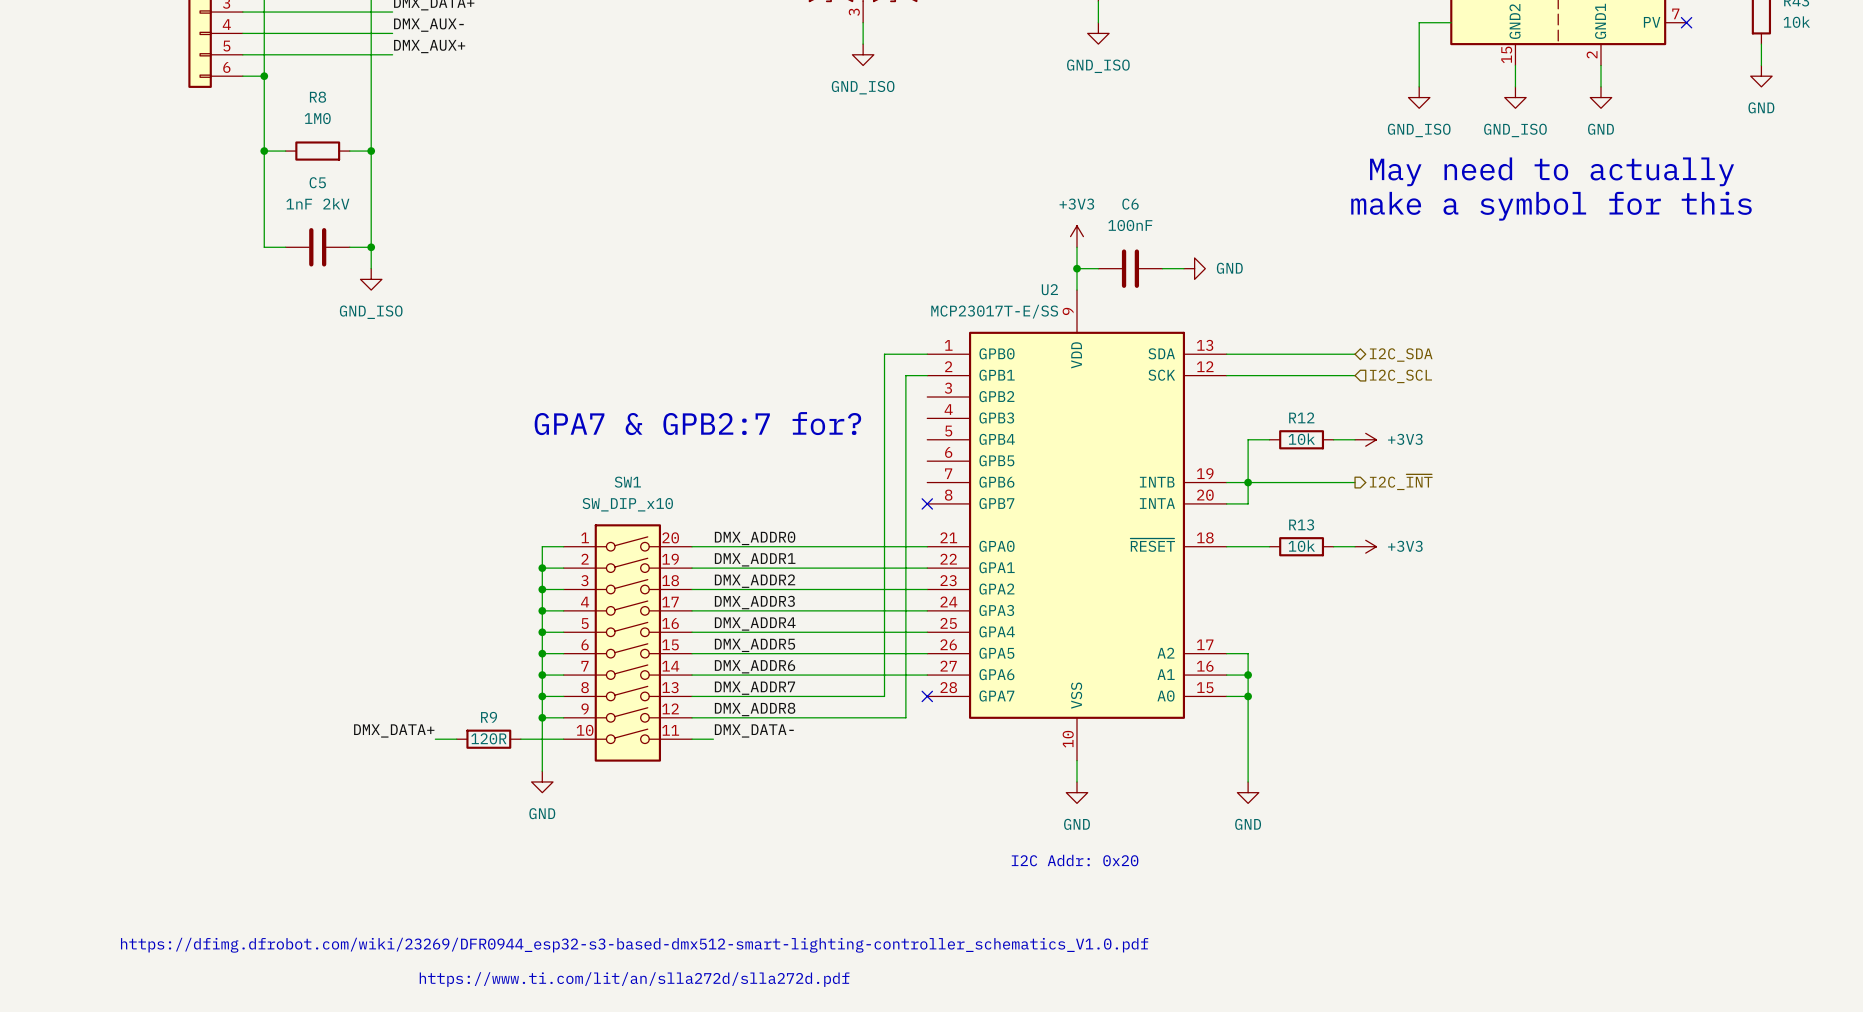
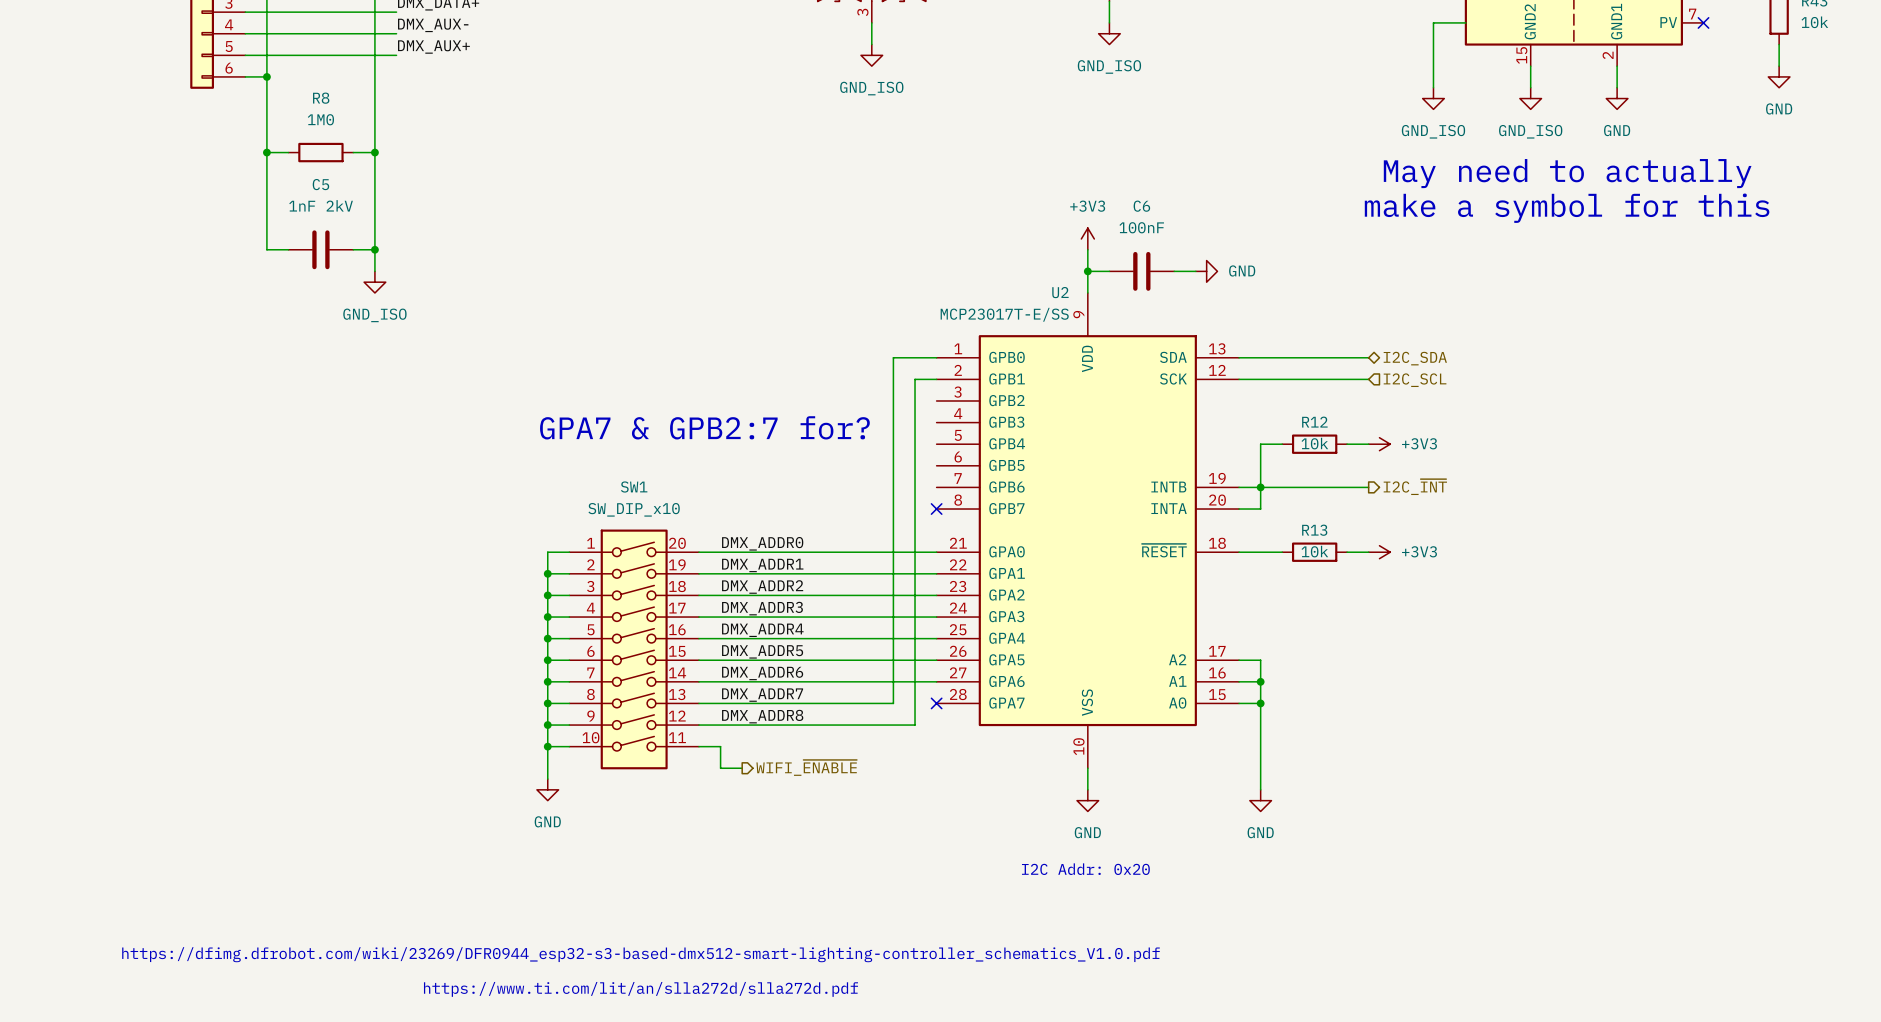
label: DMX_DATA+ (394, 730) -> none
label: DMX_DATA- (754, 730) -> none
wire: (435, 739) (456, 739) -> none
R9: 120R (488, 739) -> none
wire: (520, 739) (542, 739) -> none
junction: none -> (547, 746)
wire: none -> (720, 746) (720, 768) (742, 768)
hierarchical label: none -> WIFI_~{ENABLE} (806, 767)

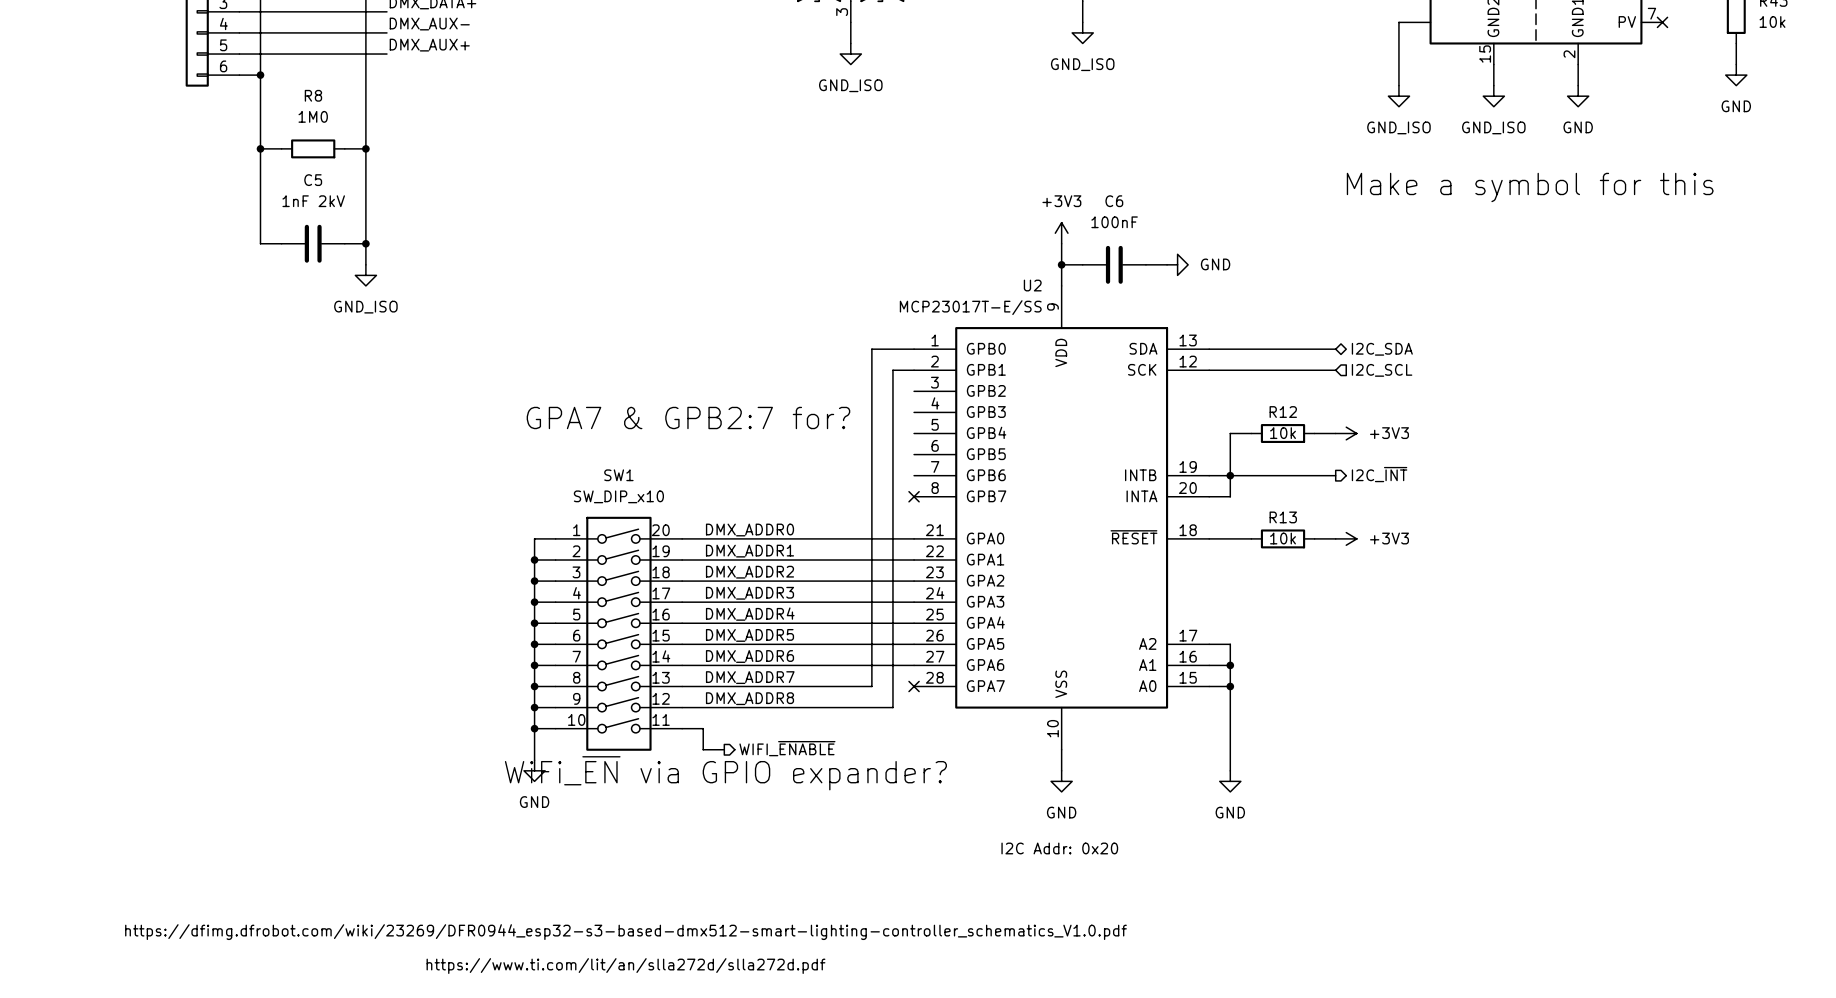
text: May need to actually (1567, 173) -> none
text: make a symbol for this (1567, 208) -> Make a symbol for this (1530, 187)
text: none -> WiFi_~{EN} via GPIO expander? (725, 773)

